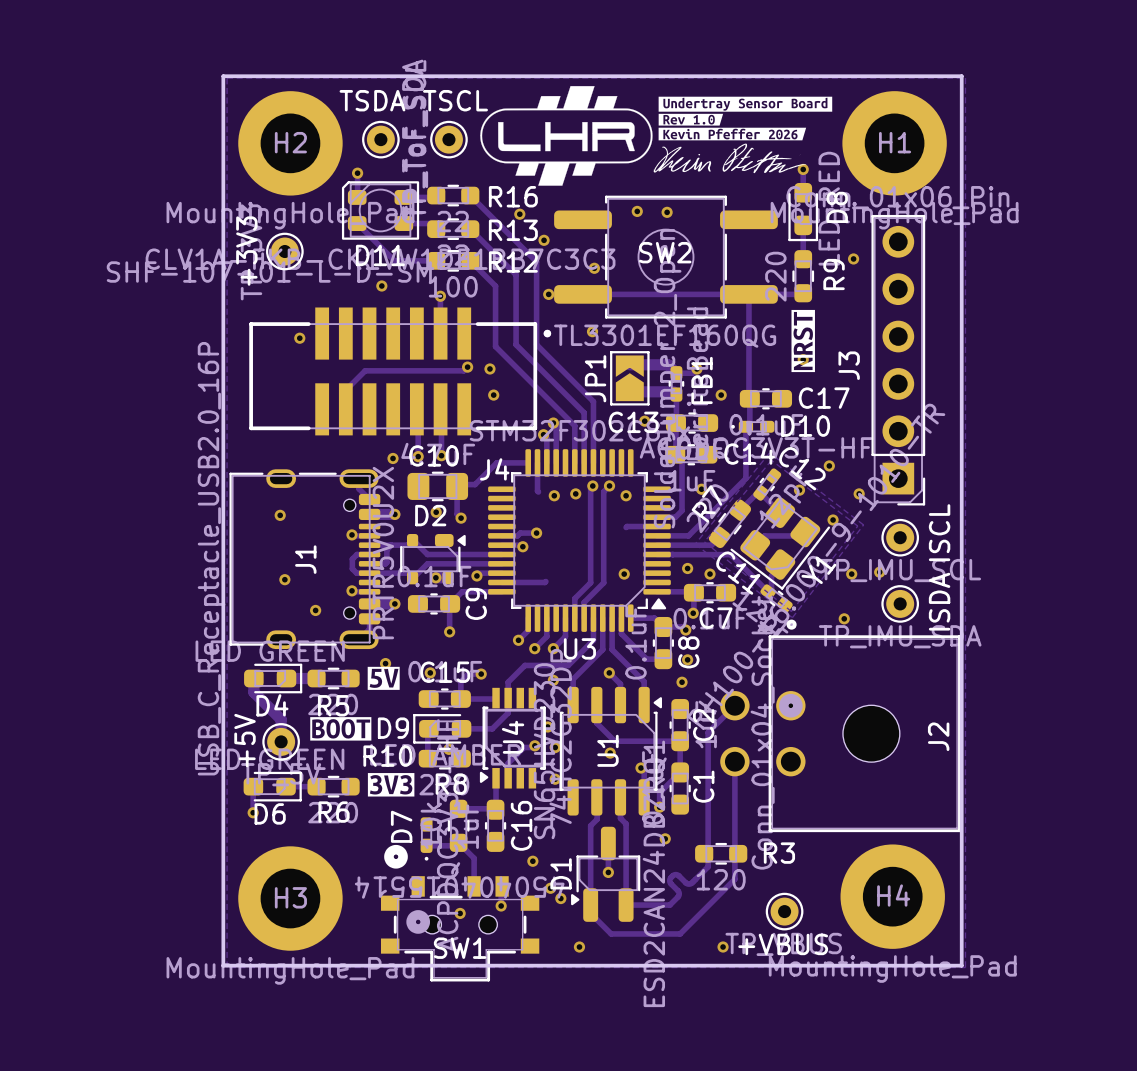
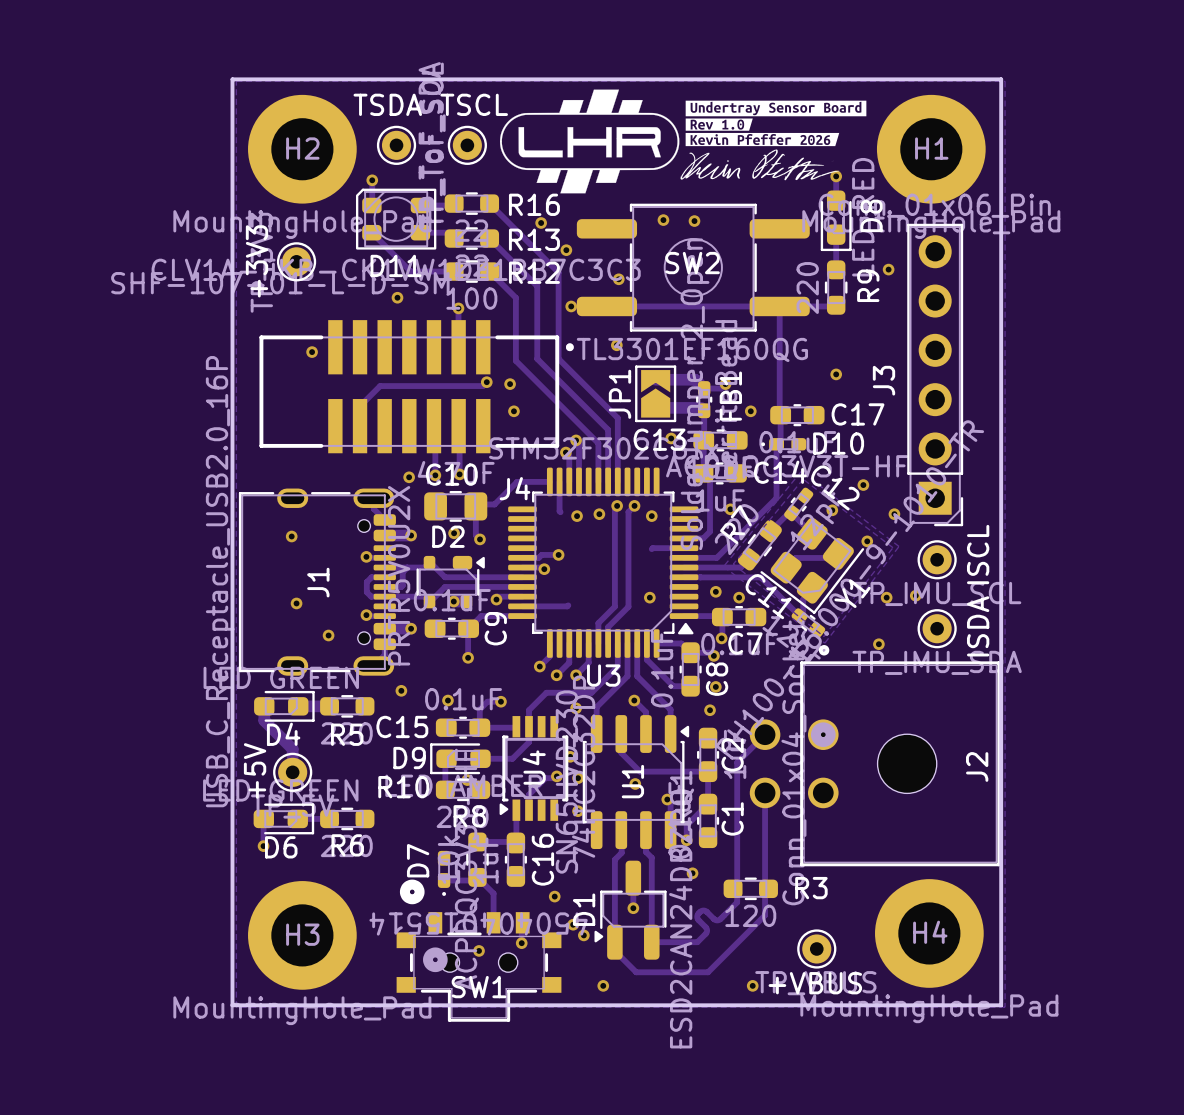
drawing: [791, 309, 815, 373] -> none
drawing: [367, 666, 400, 690] -> none
C15 name position: C15 (445, 672) -> C15 (402, 726)
drawing: [310, 717, 372, 741] -> none
drawing: [367, 773, 415, 797] -> none

